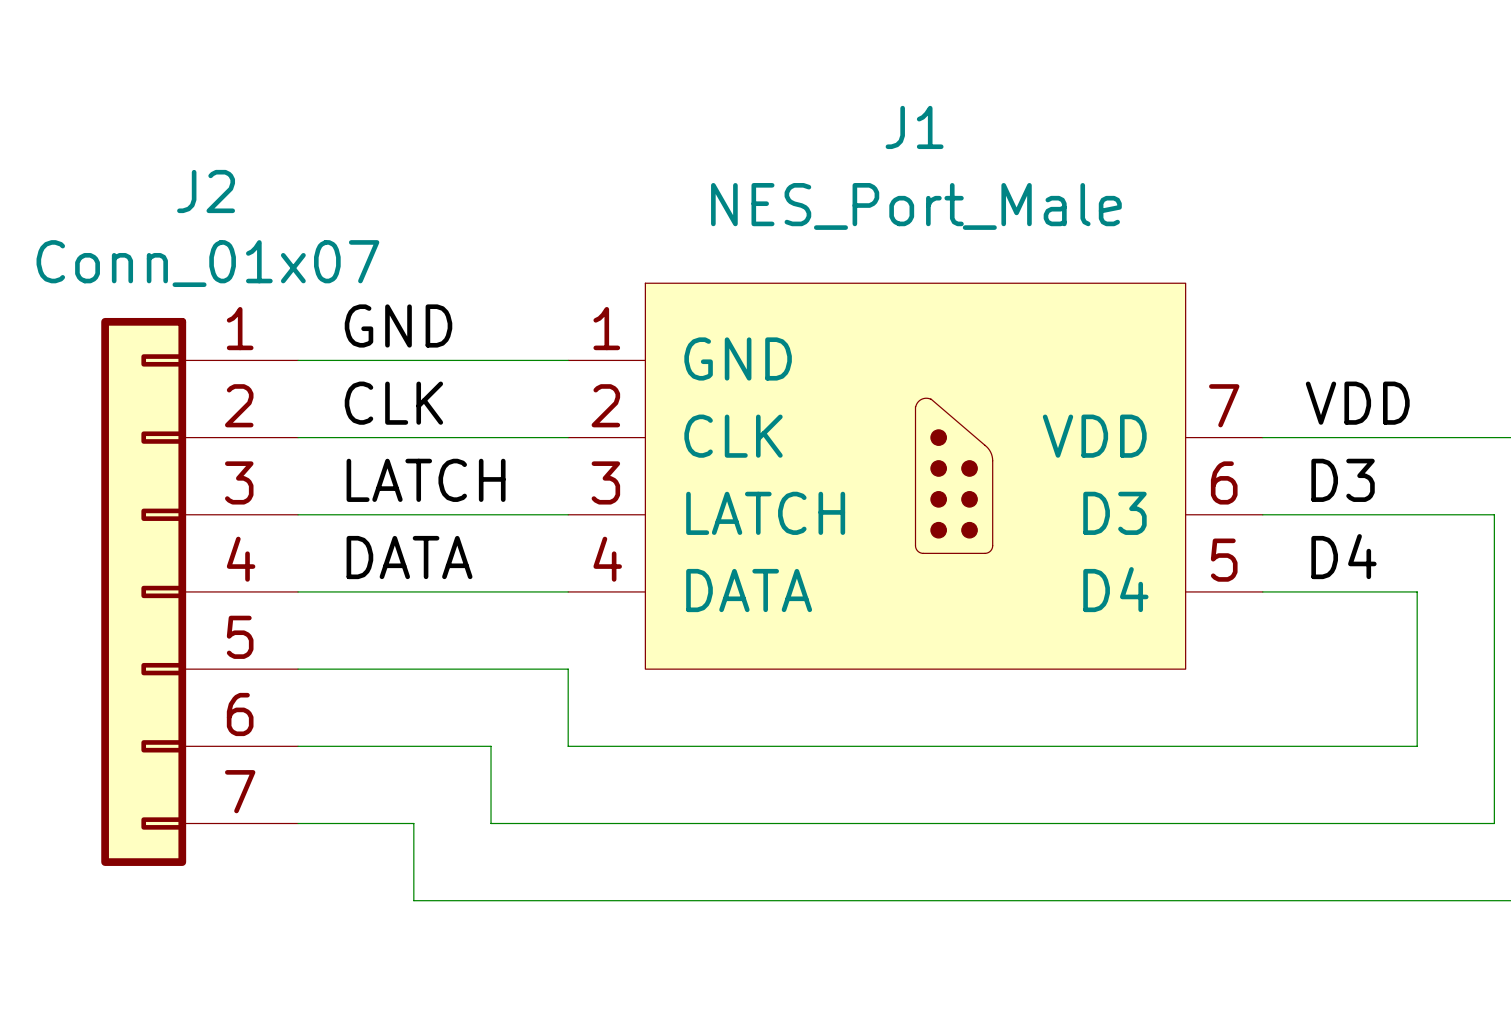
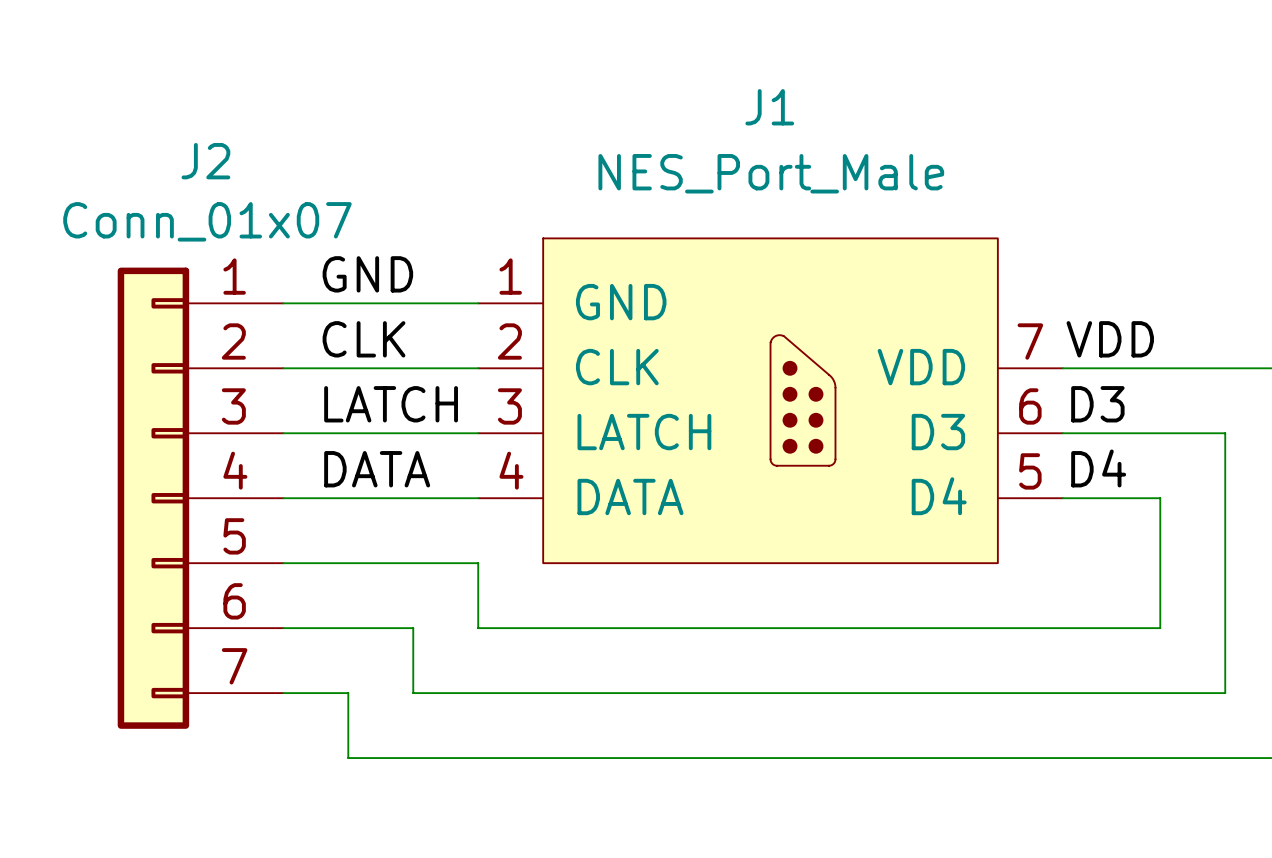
label position: GND (398, 325) -> GND (367, 274)
label position: CLK (393, 403) -> CLK (364, 339)
label position: VDD (1357, 403) -> VDD (1110, 339)
label position: LATCH (426, 480) -> LATCH (391, 404)
label position: D3 (1343, 480) -> D3 (1097, 404)
wire: (1455, 514) (1494, 514) (1494, 823) (1455, 823) -> (1225, 433) (1225, 693)
label position: D4 (1343, 556) -> D4 (1098, 468)
label position: DATA (409, 557) -> DATA (377, 469)
J2 position: (199, 591) -> (200, 498)
wire: (1378, 591) (1417, 591) (1417, 746) (1378, 746) -> (1160, 498) (1160, 628)

